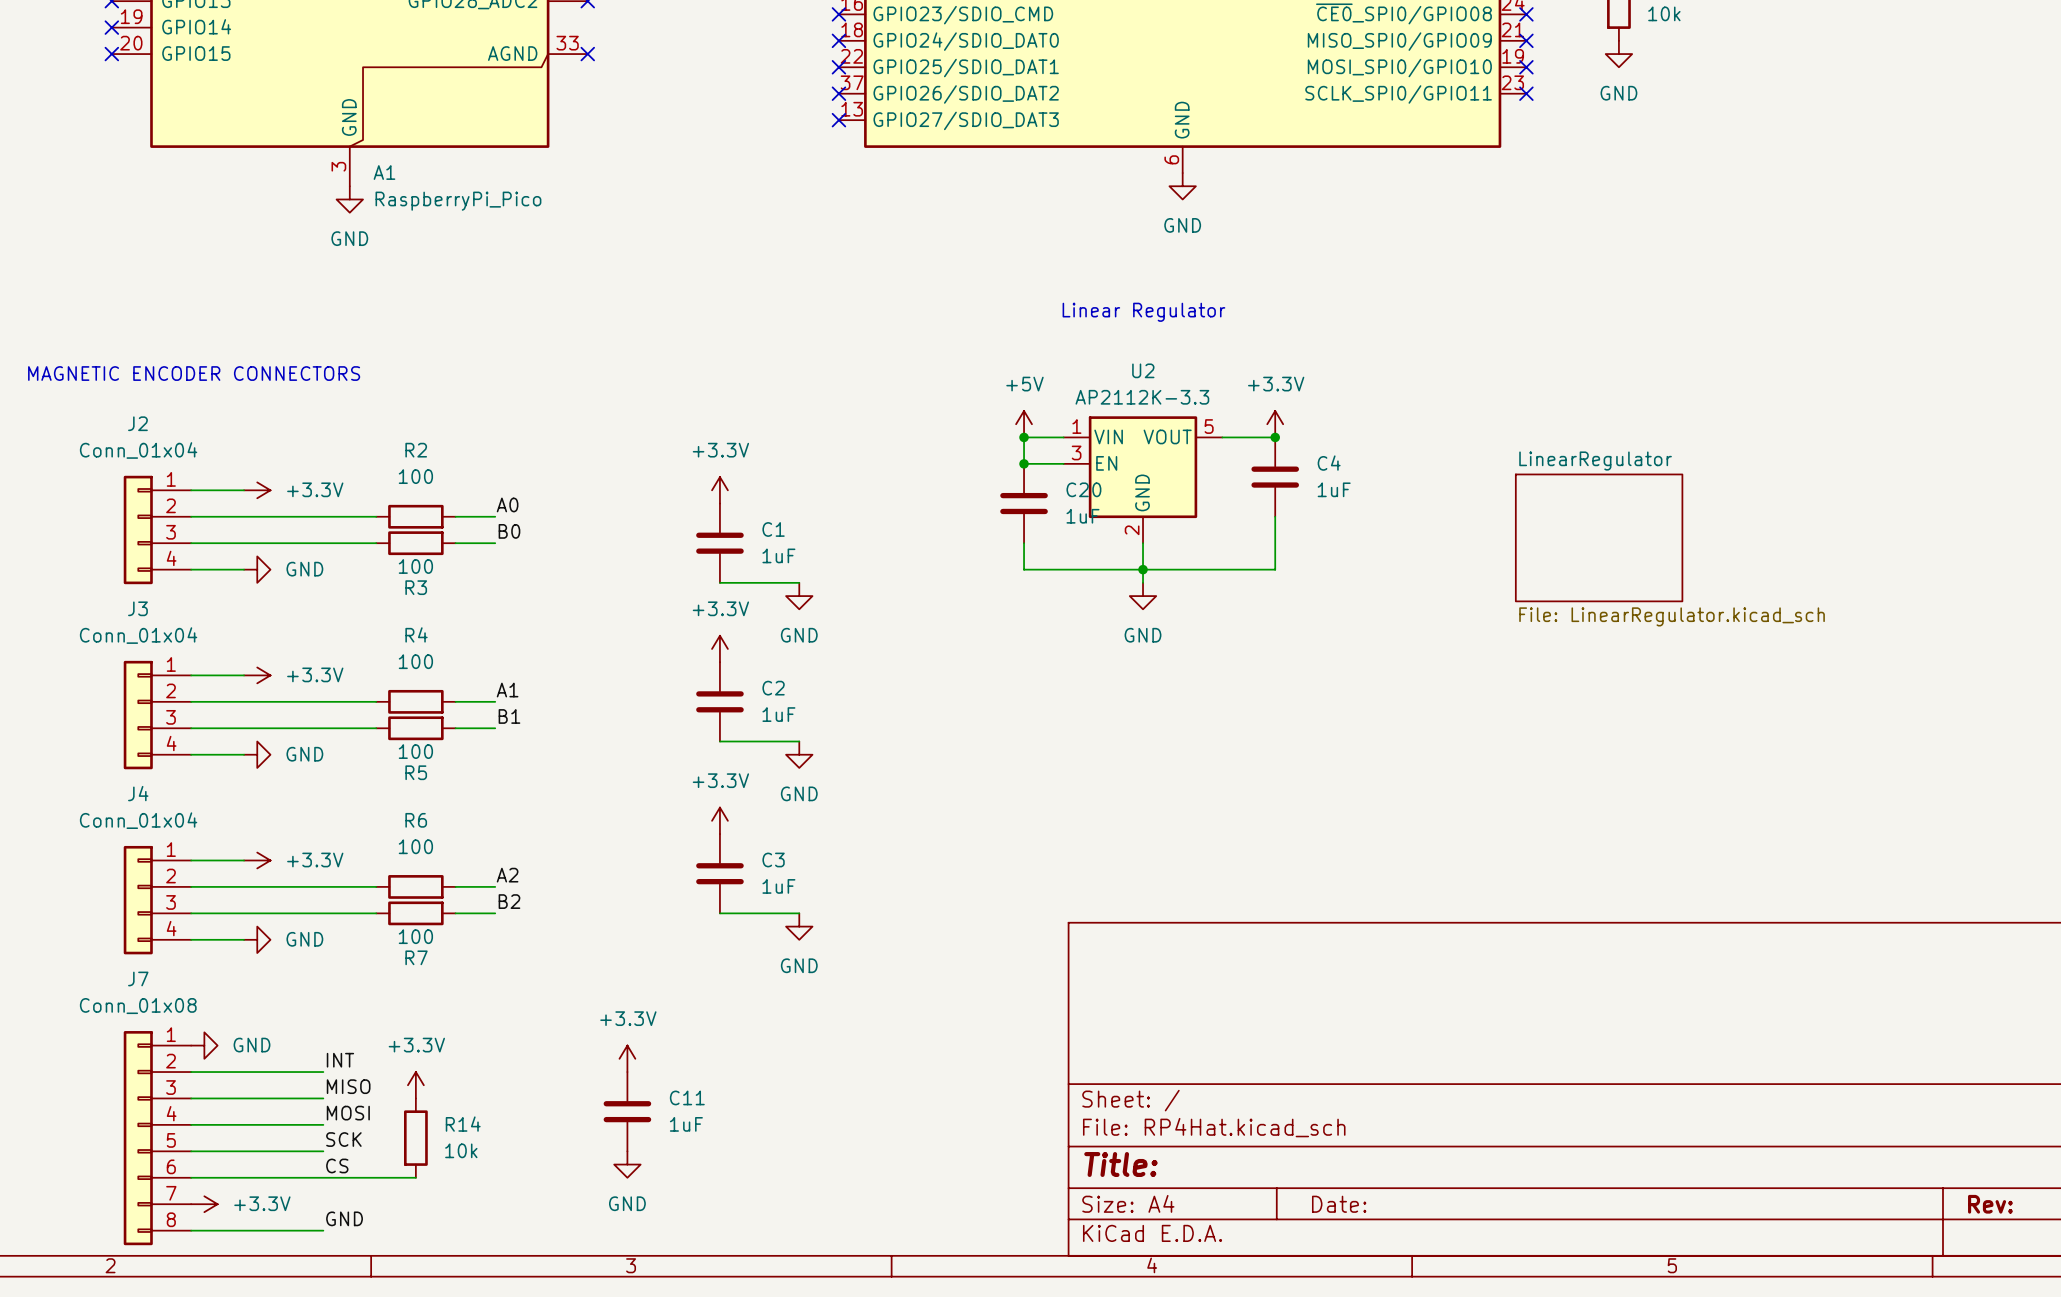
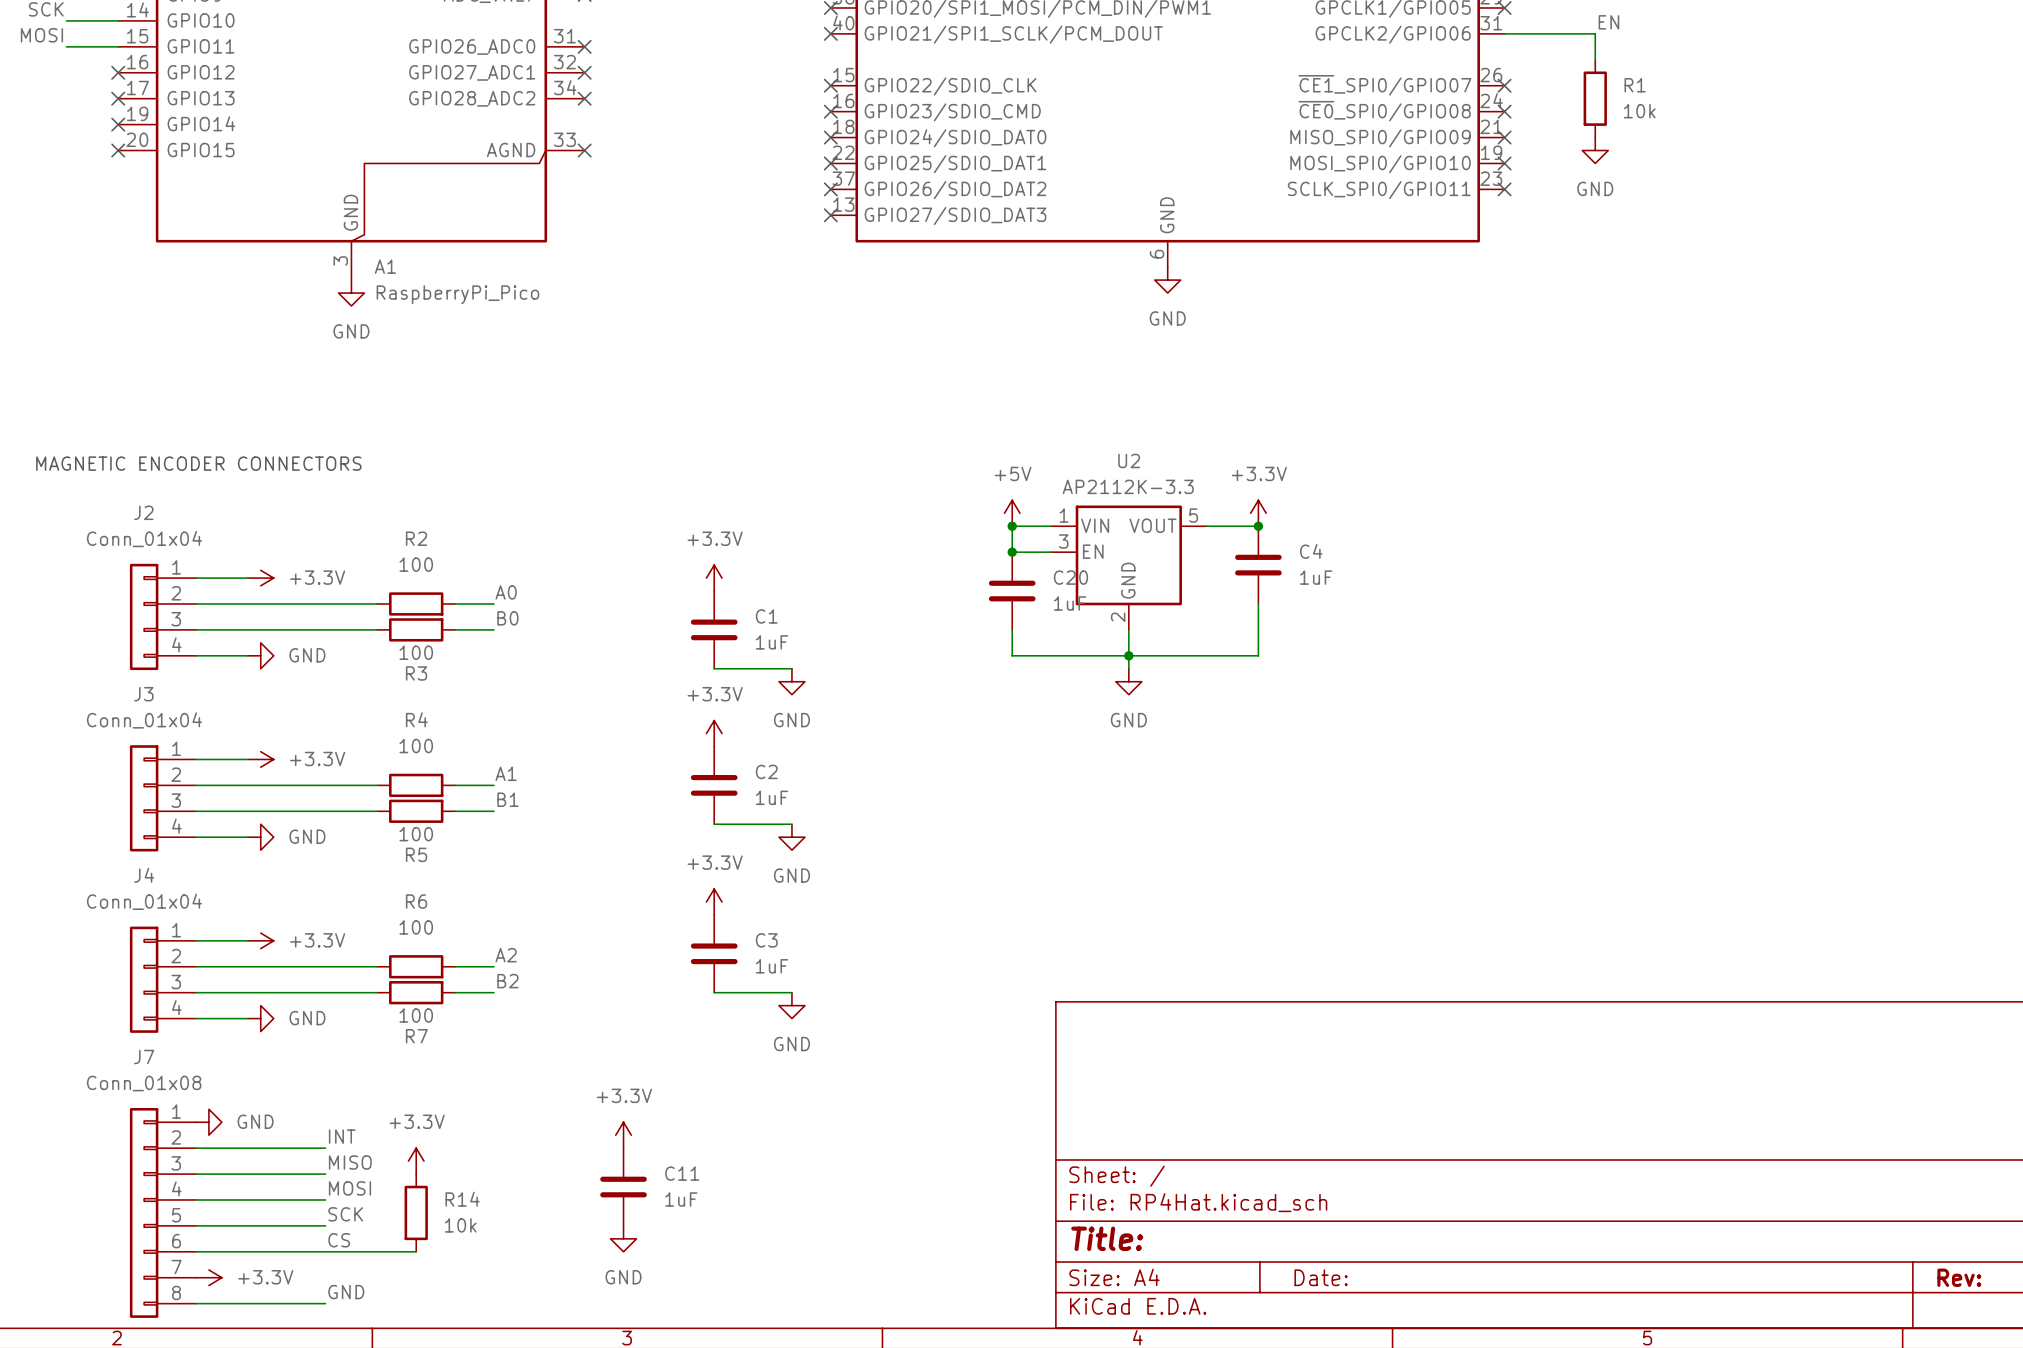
text: Linear Regulator (1143, 312) -> none
sheet LinearRegulator: File: LinearRegulator.kicad_sch (1599, 537) -> none

